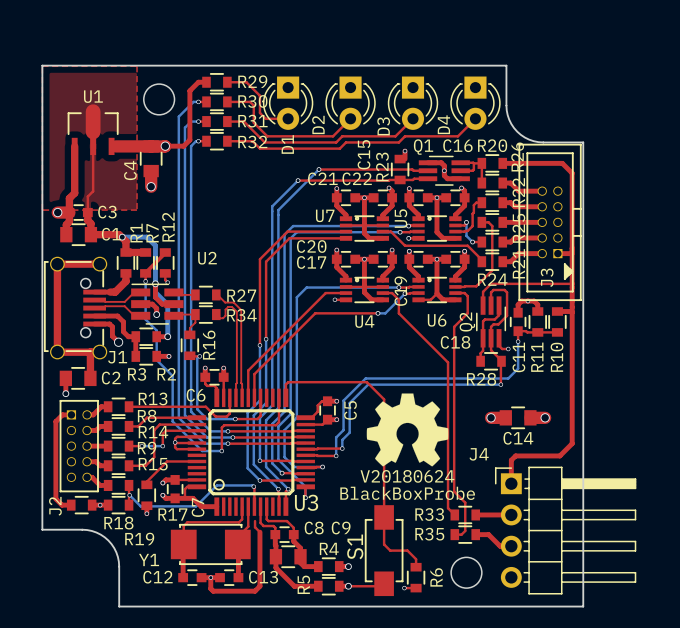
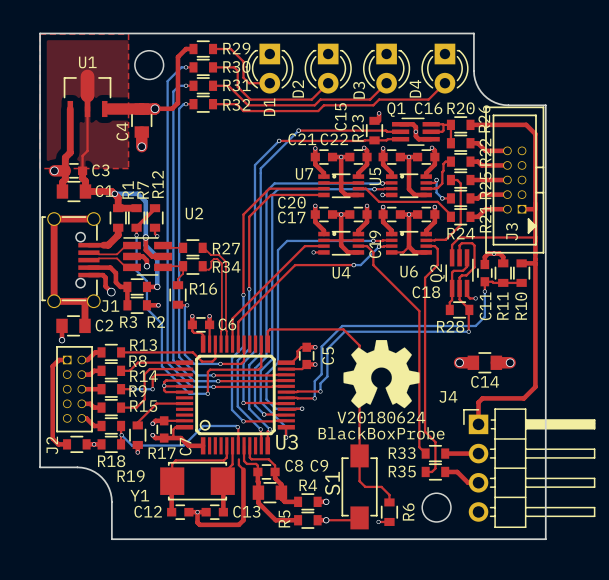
R16 name rotation: 0° (209, 345) -> 90° clockwise (203, 288)
C6 name position: C6 (196, 395) -> C6 (227, 324)

